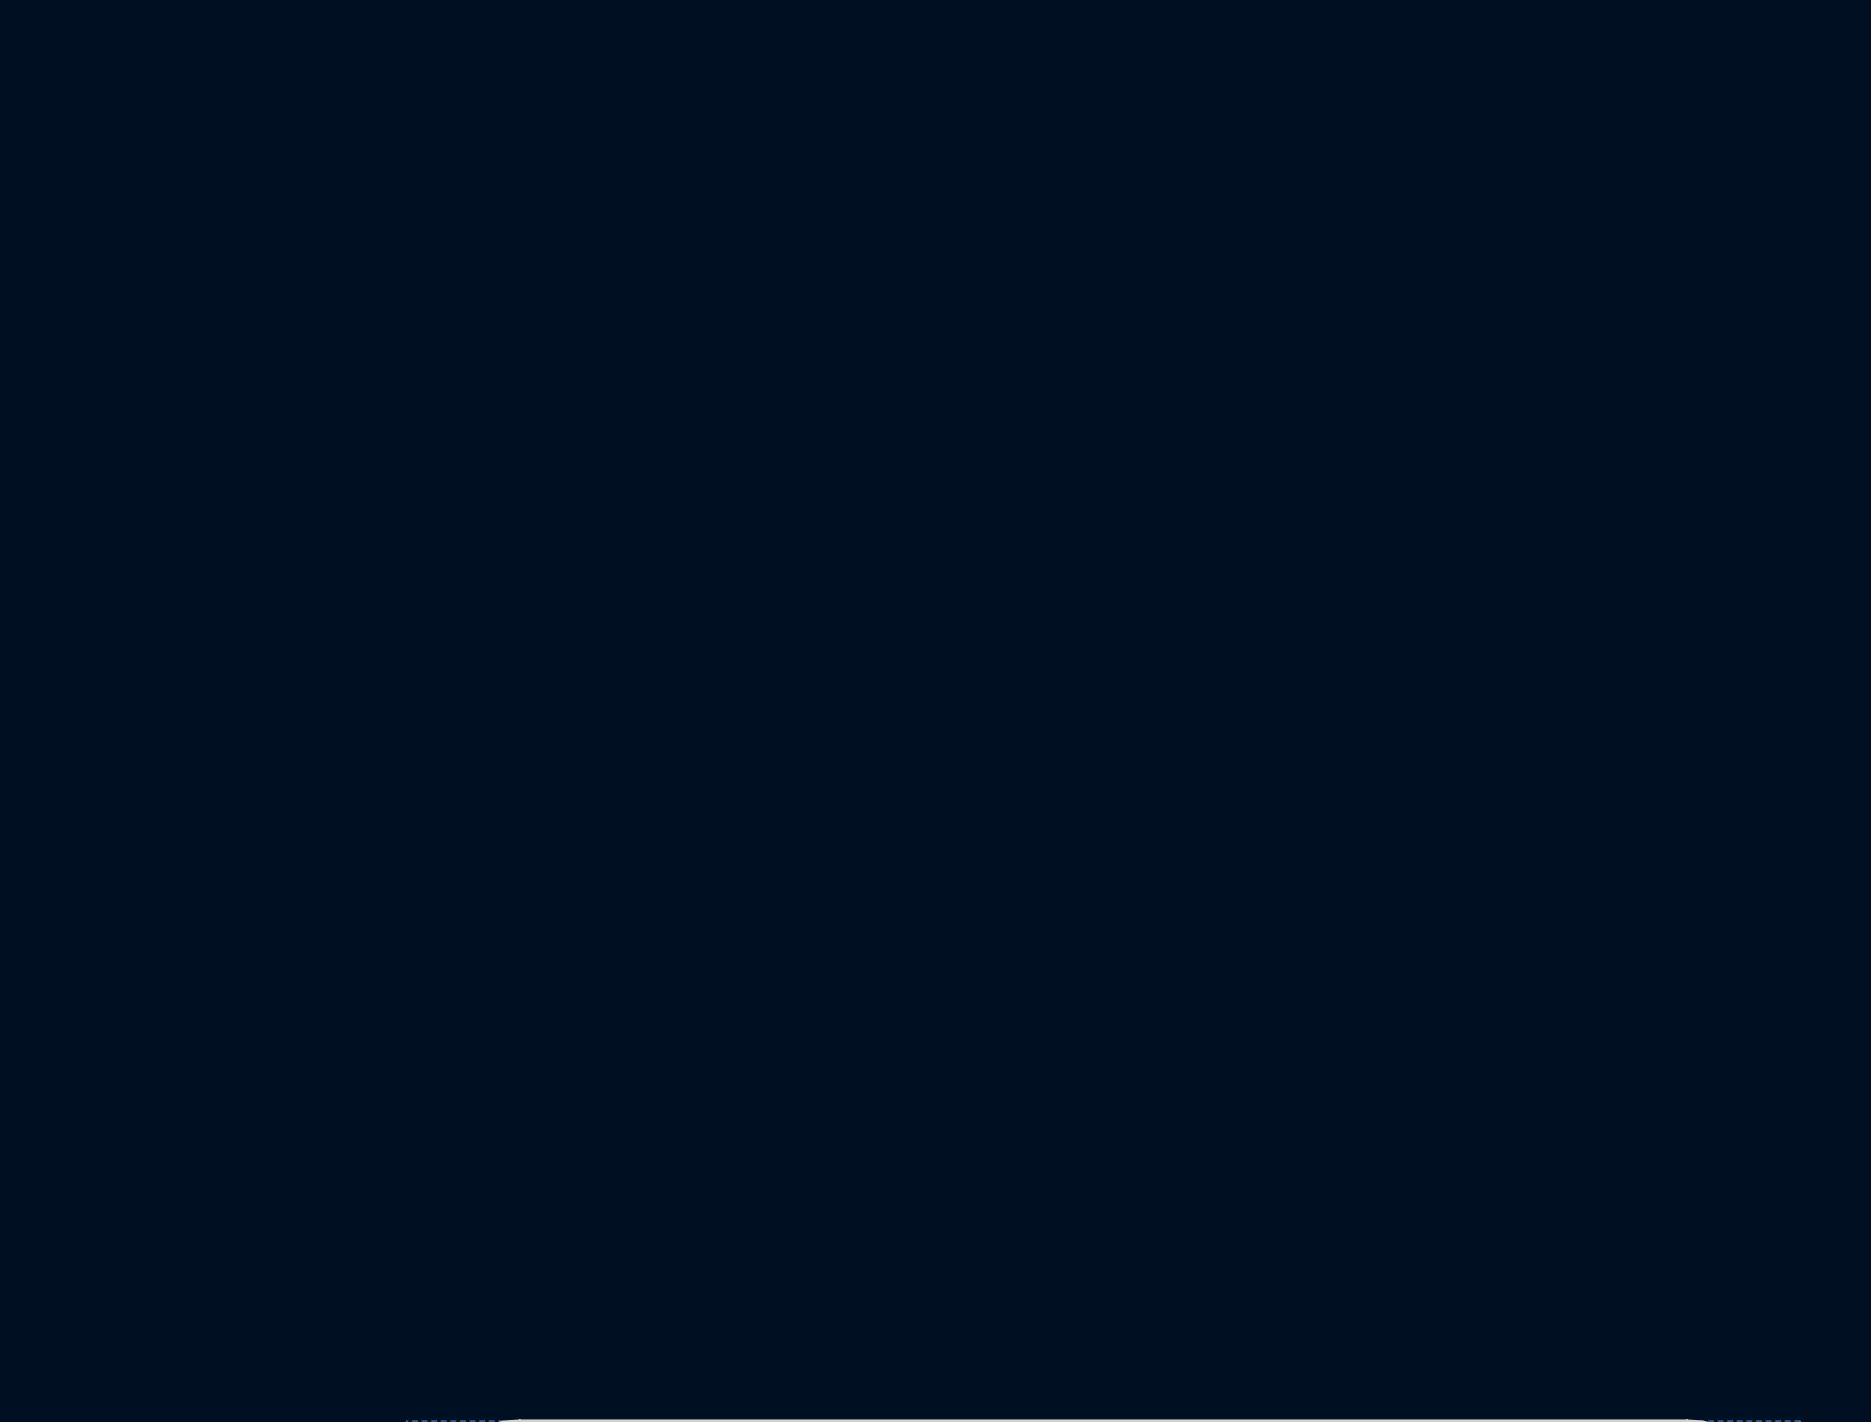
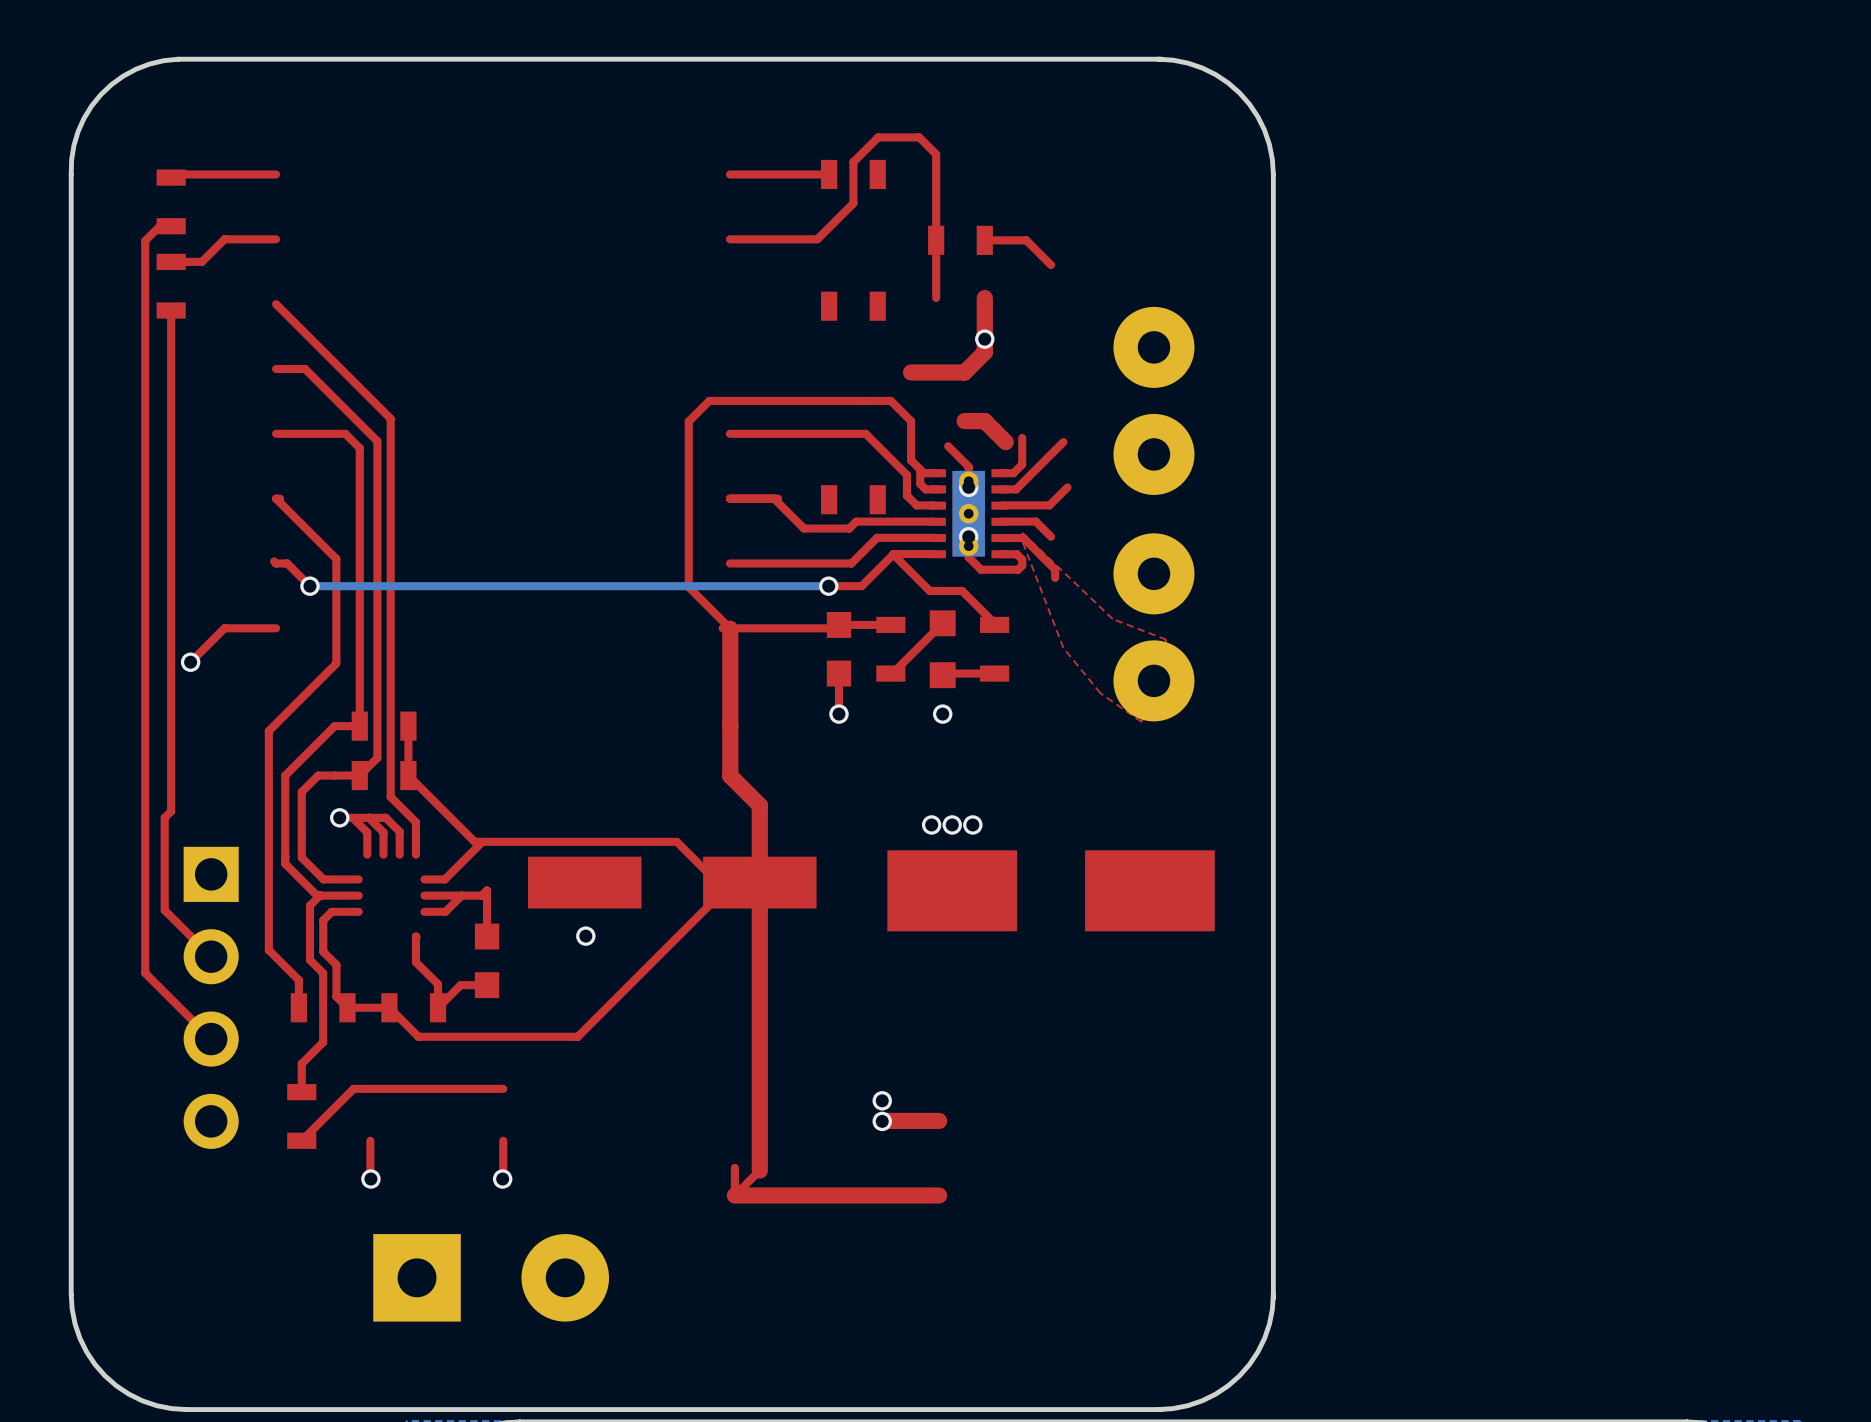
board edge: none -> (1158, 59) (1173, 60) (1202, 67) (1215, 74) (1239, 92) (1257, 116) (1269, 144) (1272, 159) (1273, 1298)
board edge: none -> (1162, 59) (163, 60) (136, 69) (123, 76) (100, 94) (84, 118) (78, 131) (71, 159) (71, 174) (71, 1294) (75, 1324) (79, 1338) (86, 1351) (104, 1375) (128, 1394) (142, 1400) (171, 1408) (186, 1409) (1162, 1409)
top track: none -> (276, 174) (174, 174) (171, 177)
top track: none -> (829, 174) (729, 174)
part: none -> (853, 174)
part: none -> (171, 201)
top track: none -> (171, 226) (159, 226) (145, 240) (145, 973) (211, 1039)
top track: none -> (276, 239) (224, 239) (201, 261) (171, 261)
top track: none -> (729, 239) (817, 239) (853, 203) (853, 162) (878, 137) (919, 137) (936, 154) (936, 297)
part: none -> (960, 240)
top track: none -> (984, 240) (1026, 240) (1051, 265)
part: none -> (171, 286)
top track: none -> (984, 297) (984, 352) (964, 372) (911, 372)
top track: none -> (276, 304) (390, 418) (390, 796) (415, 822) (415, 854)
part: none -> (853, 306)
top track: none -> (171, 310) (171, 811) (164, 817) (164, 910) (211, 956)
via: none -> (984, 339)
top track: none -> (276, 368) (305, 368) (377, 441) (377, 757) (359, 775) (318, 775) (301, 792) (301, 857) (323, 879) (358, 879)
part: none -> (1153, 400)
top track: none -> (964, 421) (984, 421) (1005, 442)
top track: none -> (276, 433) (345, 433) (359, 448) (359, 726) (334, 726) (285, 775) (285, 863) (317, 895) (358, 895)
top track: none -> (729, 433) (865, 433) (906, 475) (906, 495) (916, 505) (934, 505)
top track: none -> (1022, 437) (1022, 464) (1013, 473) (999, 473)
top track: none -> (1063, 442) (1016, 489) (999, 489)
top track: none -> (948, 446) (968, 466) (968, 481)
top track: none -> (920, 469) (920, 483) (925, 489) (937, 489)
top track: none -> (937, 473) (923, 473) (911, 460) (911, 421) (890, 400) (709, 400) (688, 421) (688, 587) (730, 628)
via: none -> (968, 487)
top track: none -> (1067, 487) (1049, 505) (1002, 505)
top track: none -> (280, 498) (276, 498) (336, 558) (336, 663) (268, 731) (268, 950) (298, 980) (298, 1007)
top track: none -> (774, 498) (804, 528) (849, 528) (856, 521) (934, 521)
top track: none -> (778, 498) (729, 498)
part: none -> (853, 499)
part: none -> (968, 513)
top track: none -> (1002, 521) (1035, 521) (1051, 536)
top zone outline: none -> (1022, 532) (1022, 540) (1063, 647) (1100, 693) (1141, 722) (1166, 639) (1112, 619) (1022, 532)
via: none -> (968, 536)
top track: none -> (934, 537) (877, 537) (851, 563) (729, 563)
top track: none -> (999, 538) (1023, 538) (1055, 569) (1055, 577)
top track: none -> (968, 546) (968, 557) (981, 569) (1018, 569) (1022, 565) (1022, 559) (1016, 554) (999, 554)
top track: none -> (893, 554) (861, 586) (828, 586)
top track: none -> (893, 554) (929, 590) (962, 590) (994, 624)
top track: none -> (934, 554) (893, 554)
top track: none -> (274, 561) (276, 563) (287, 563) (309, 586)
via: none -> (309, 586)
bottom track: none -> (828, 586) (309, 586)
via: none -> (828, 586)
top track: none -> (942, 623) (890, 673)
top track: none -> (890, 624) (838, 624) (835, 628) (722, 628)
part: none -> (1153, 627)
top track: none -> (276, 628) (224, 628) (190, 662)
top track: none -> (730, 628) (730, 775) (759, 805) (759, 1170) (734, 1195)
part: none -> (838, 649)
part: none -> (890, 649)
part: none -> (942, 649)
part: none -> (994, 649)
via: none -> (190, 662)
top track: none -> (838, 673) (838, 714)
top track: none -> (994, 673) (944, 673) (942, 675) (941, 673)
via: none -> (838, 714)
via: none -> (942, 714)
part: none -> (384, 726)
top track: none -> (408, 726) (408, 775) (474, 841) (676, 841) (717, 882) (759, 882) (759, 885)
part: none -> (384, 775)
top track: none -> (339, 817) (385, 817) (399, 831) (399, 854)
via: none -> (339, 817)
top track: none -> (352, 817) (367, 832) (367, 854)
top track: none -> (368, 817) (383, 832) (383, 854)
via: none -> (931, 824)
via: none -> (952, 824)
via: none -> (972, 824)
top track: none -> (482, 841) (444, 879) (424, 879)
part: none -> (672, 882)
top track: none -> (731, 882) (577, 1036)
part: none -> (1051, 890)
top track: none -> (320, 895) (309, 905) (309, 960) (323, 973) (323, 1042) (301, 1063) (301, 1092)
top track: none -> (424, 895) (481, 895) (487, 890) (487, 936)
top track: none -> (461, 895) (445, 911) (424, 911)
top track: none -> (358, 911) (331, 911) (323, 920) (323, 951) (336, 964) (336, 996) (347, 1007) (389, 1007) (418, 1036) (577, 1036)
via: none -> (585, 936)
top track: none -> (416, 937) (415, 962) (438, 984) (438, 1007) (460, 985) (487, 985)
part: none -> (487, 960)
part: none -> (211, 997)
part: none -> (323, 1007)
part: none -> (413, 1007)
top track: none -> (503, 1088) (353, 1088) (301, 1140)
via: none -> (882, 1100)
part: none -> (301, 1116)
top track: none -> (939, 1120) (882, 1120)
via: none -> (882, 1121)
top track: none -> (370, 1140) (370, 1179)
top track: none -> (503, 1140) (502, 1179)
top track: none -> (734, 1167) (734, 1195)
via: none -> (370, 1179)
via: none -> (502, 1179)
top track: none -> (939, 1195) (734, 1195)
part: none -> (491, 1277)
board edge: none -> (1273, 1294) (1272, 1309) (1264, 1338) (1257, 1351) (1239, 1375) (1228, 1385) (1202, 1400) (1173, 1408) (1158, 1409)

